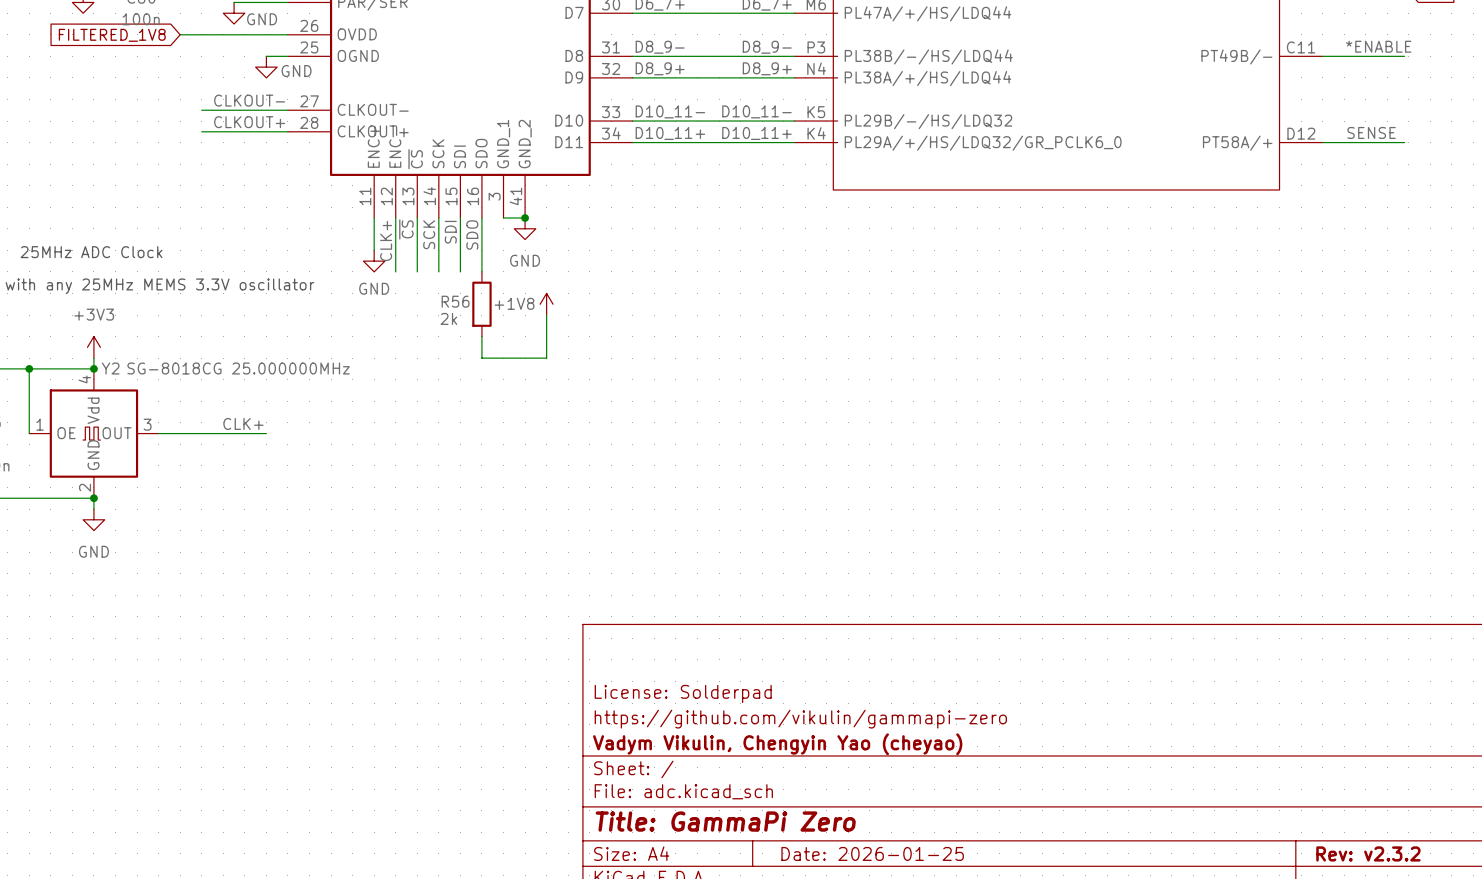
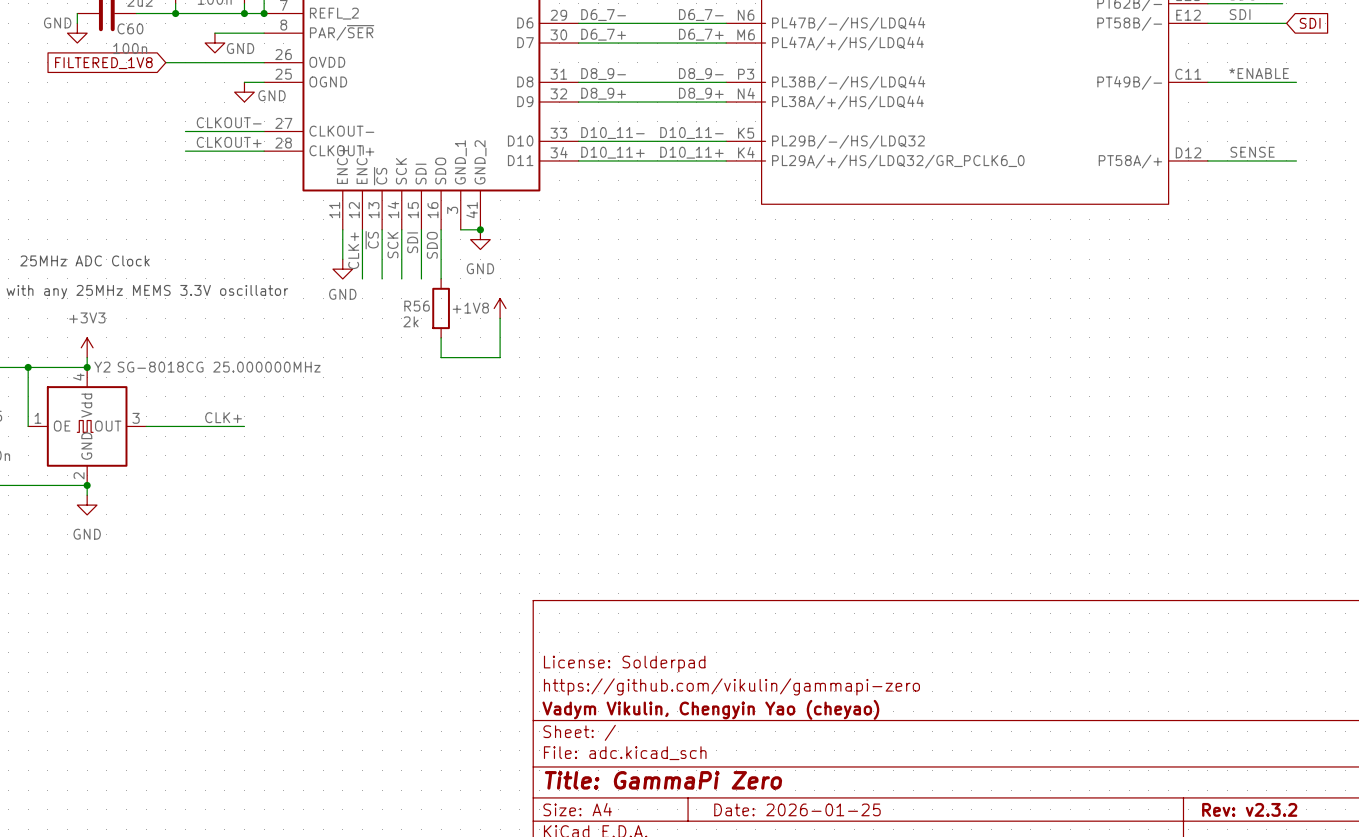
wire: none -> (1282, 82) (1296, 82)
wire: none -> (1282, 160) (1296, 160)

